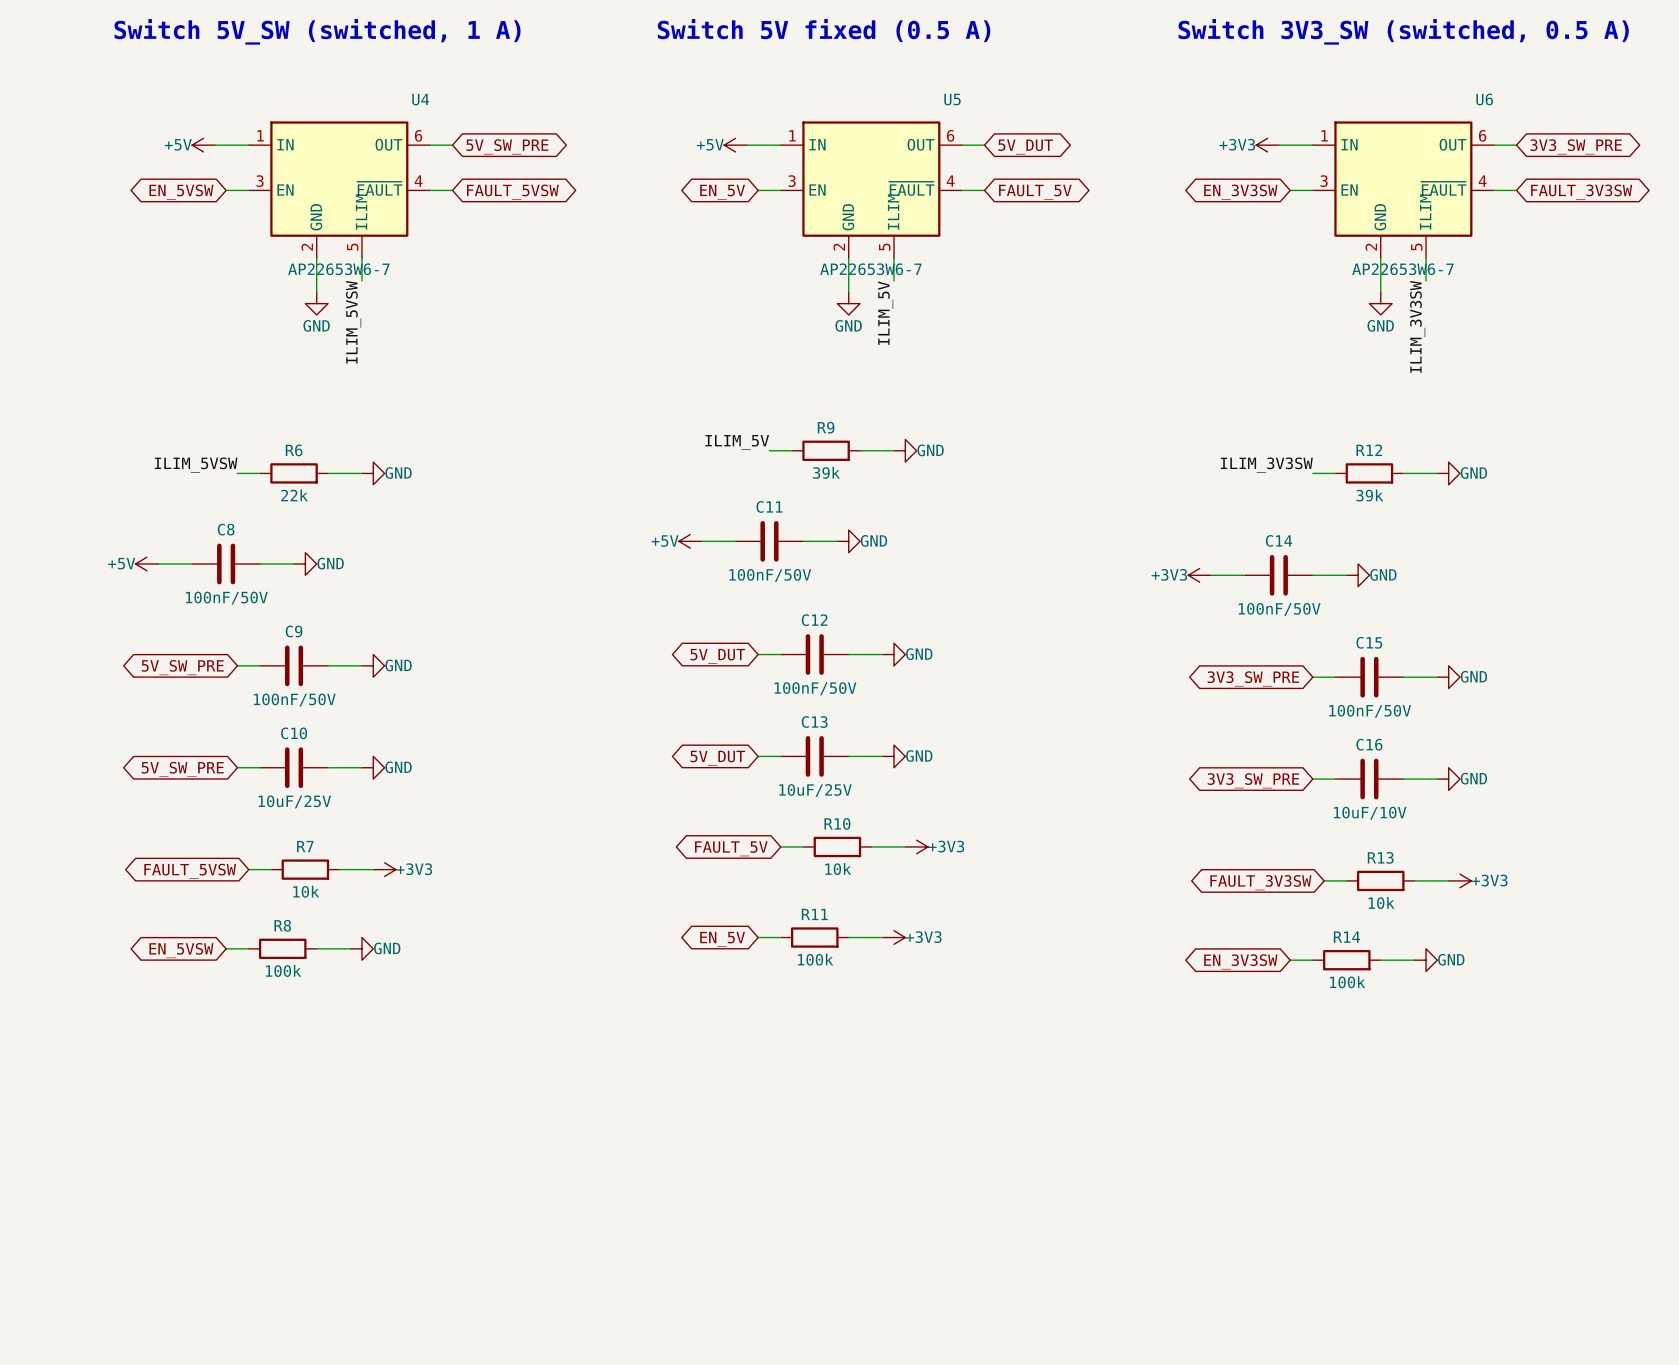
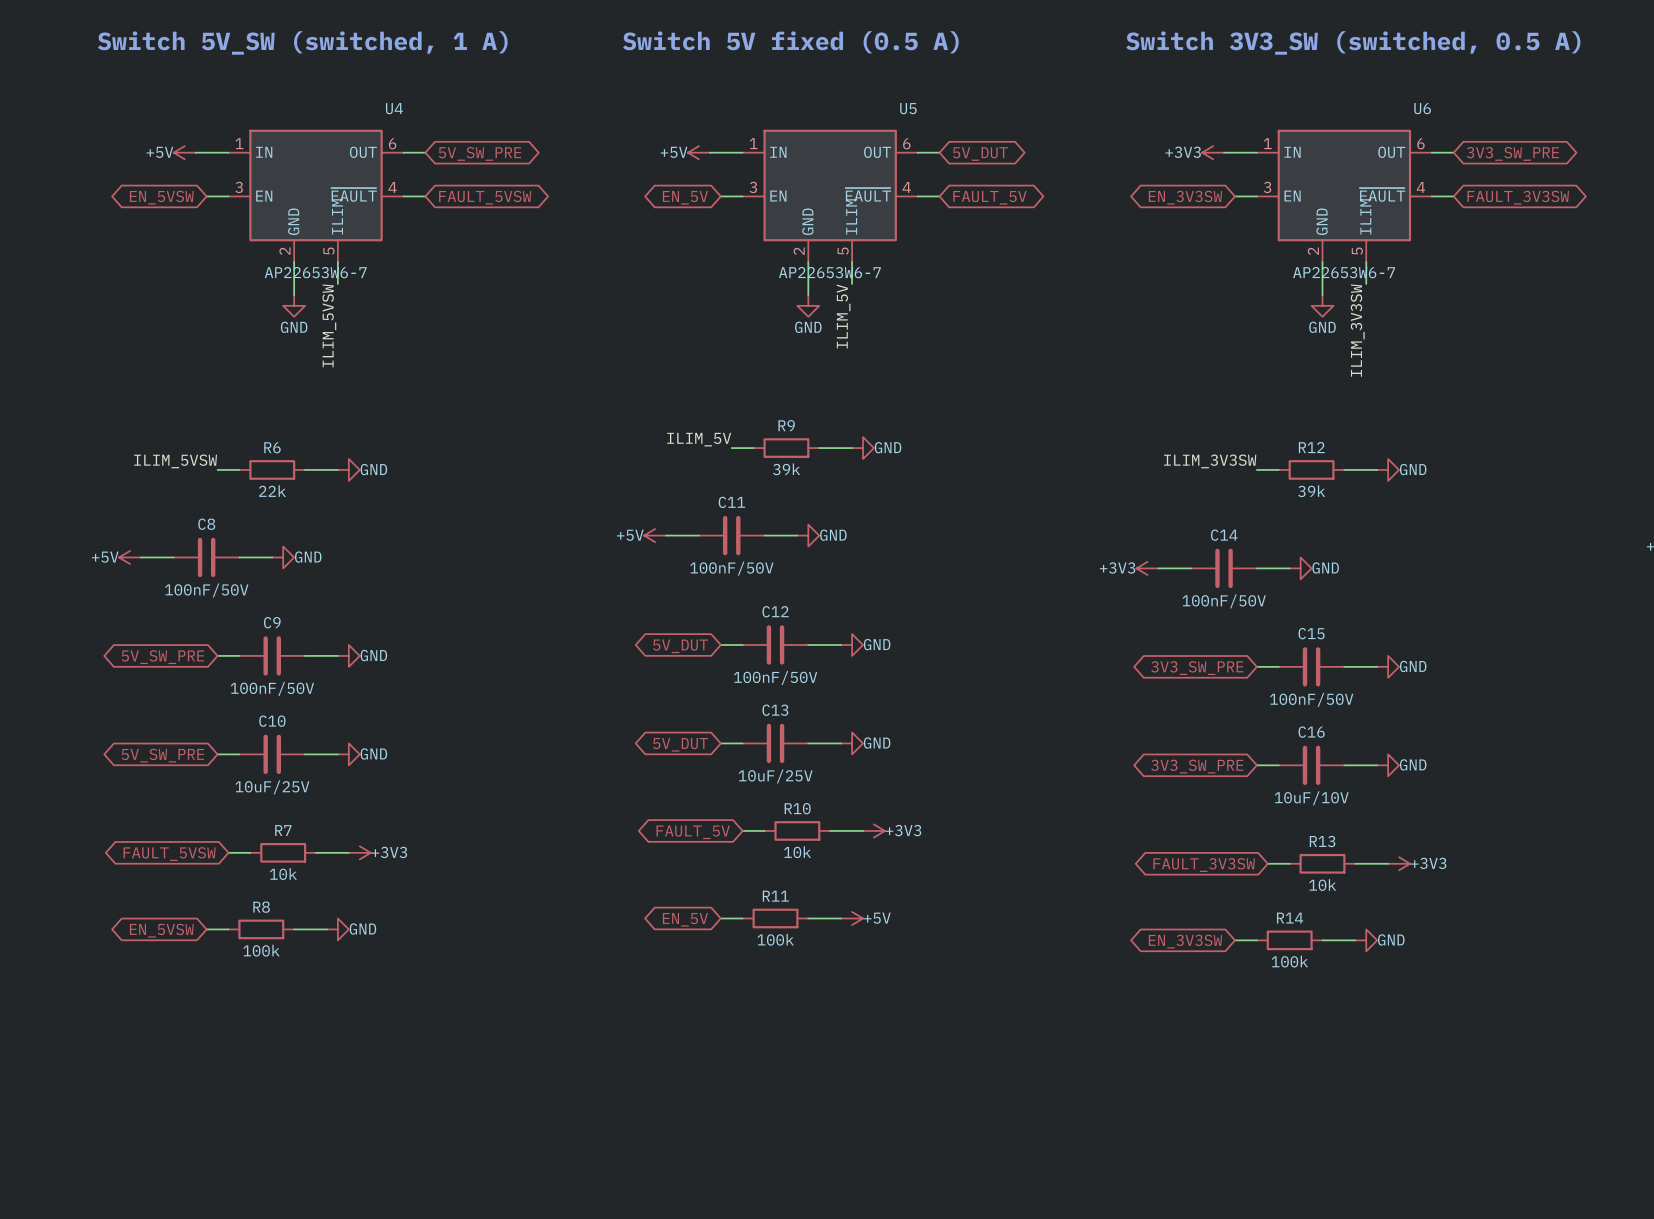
power symbol: +3V3 (894, 937) -> +5V (852, 918)

